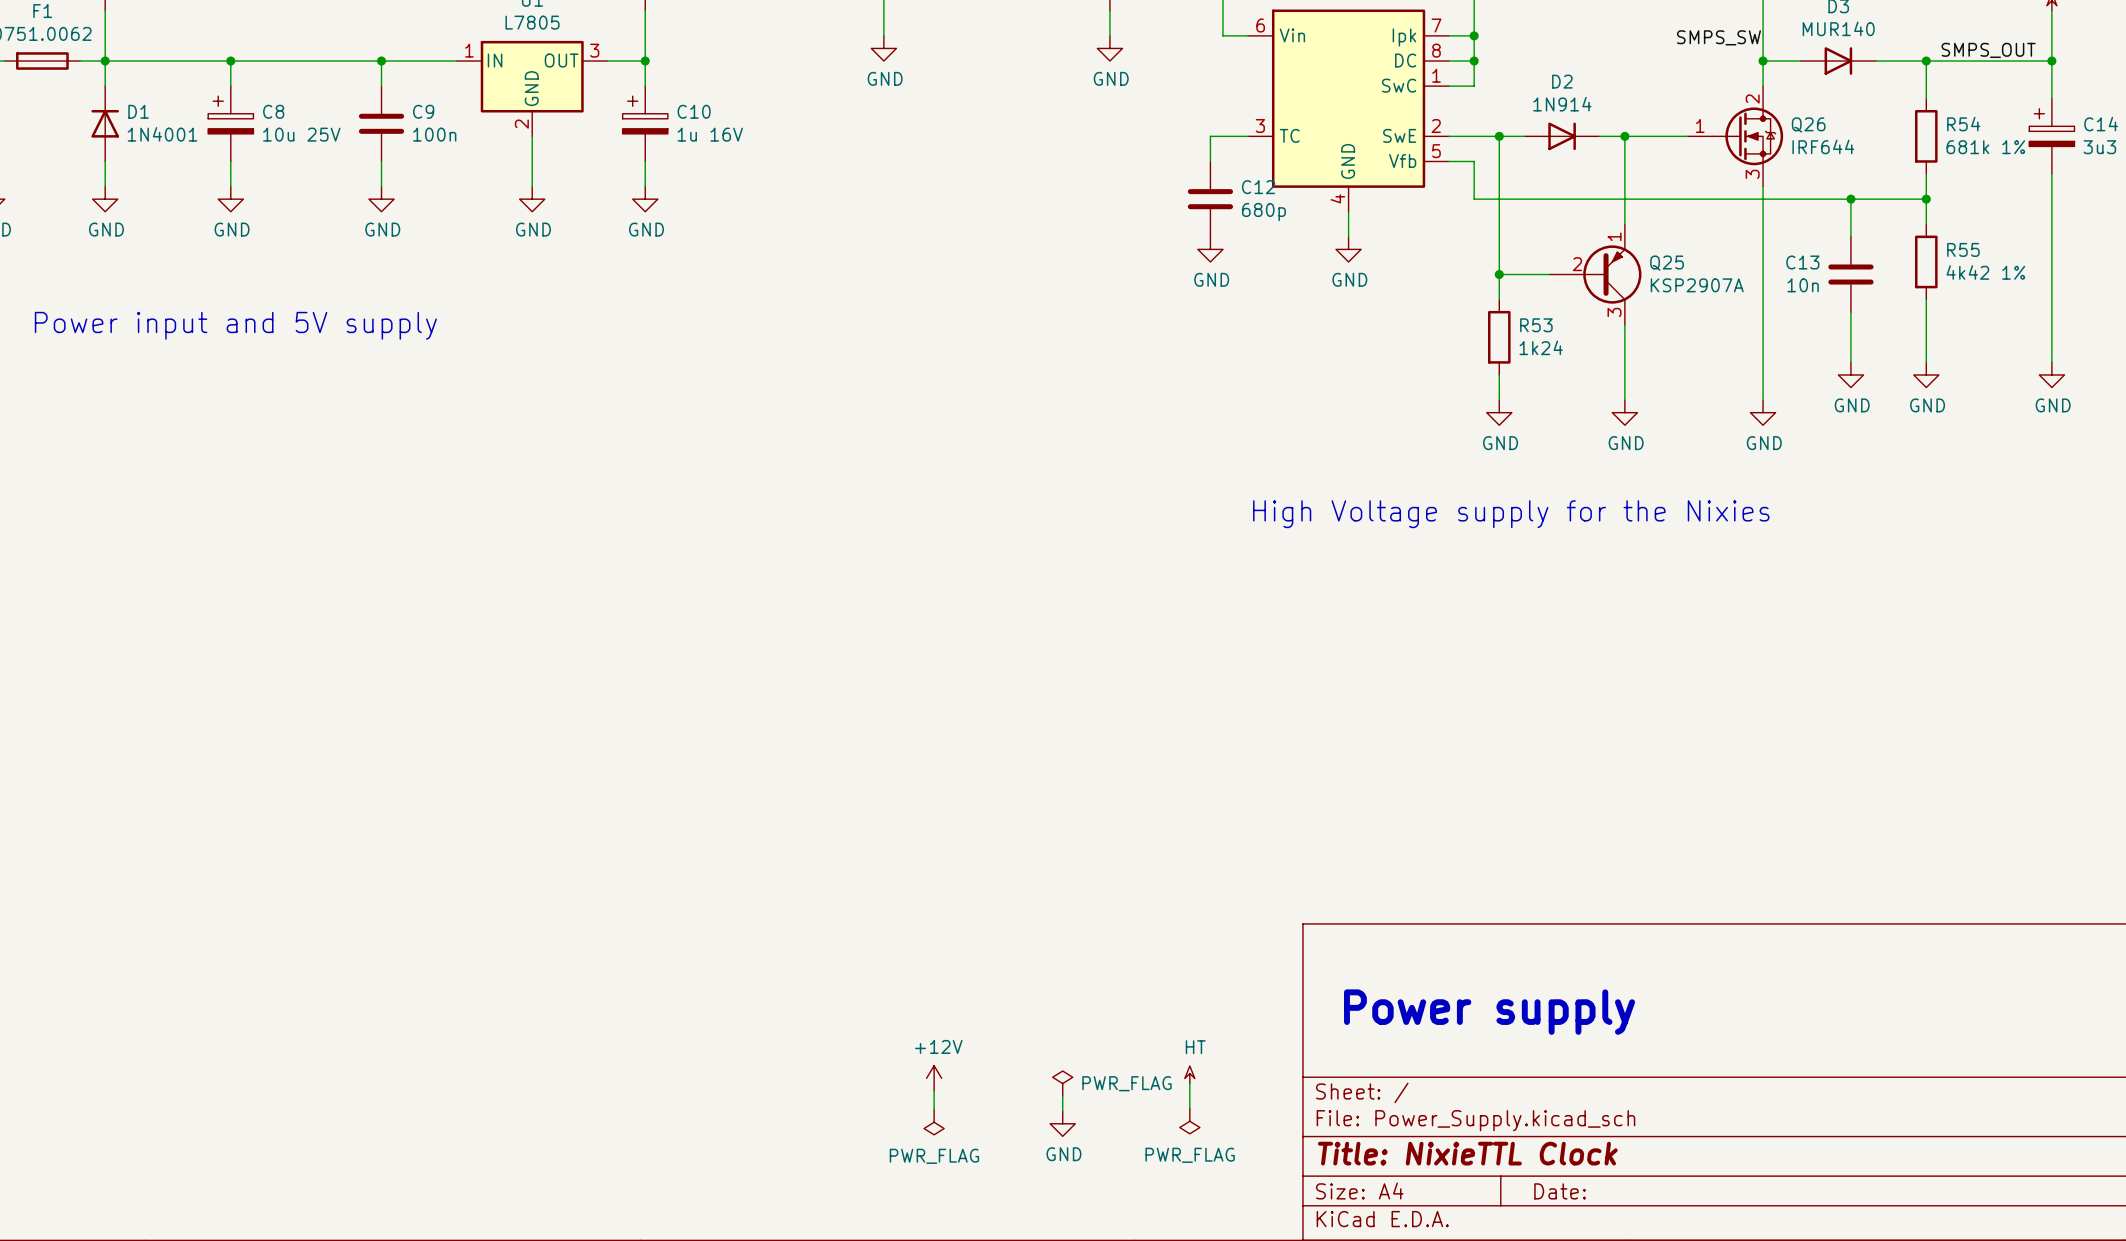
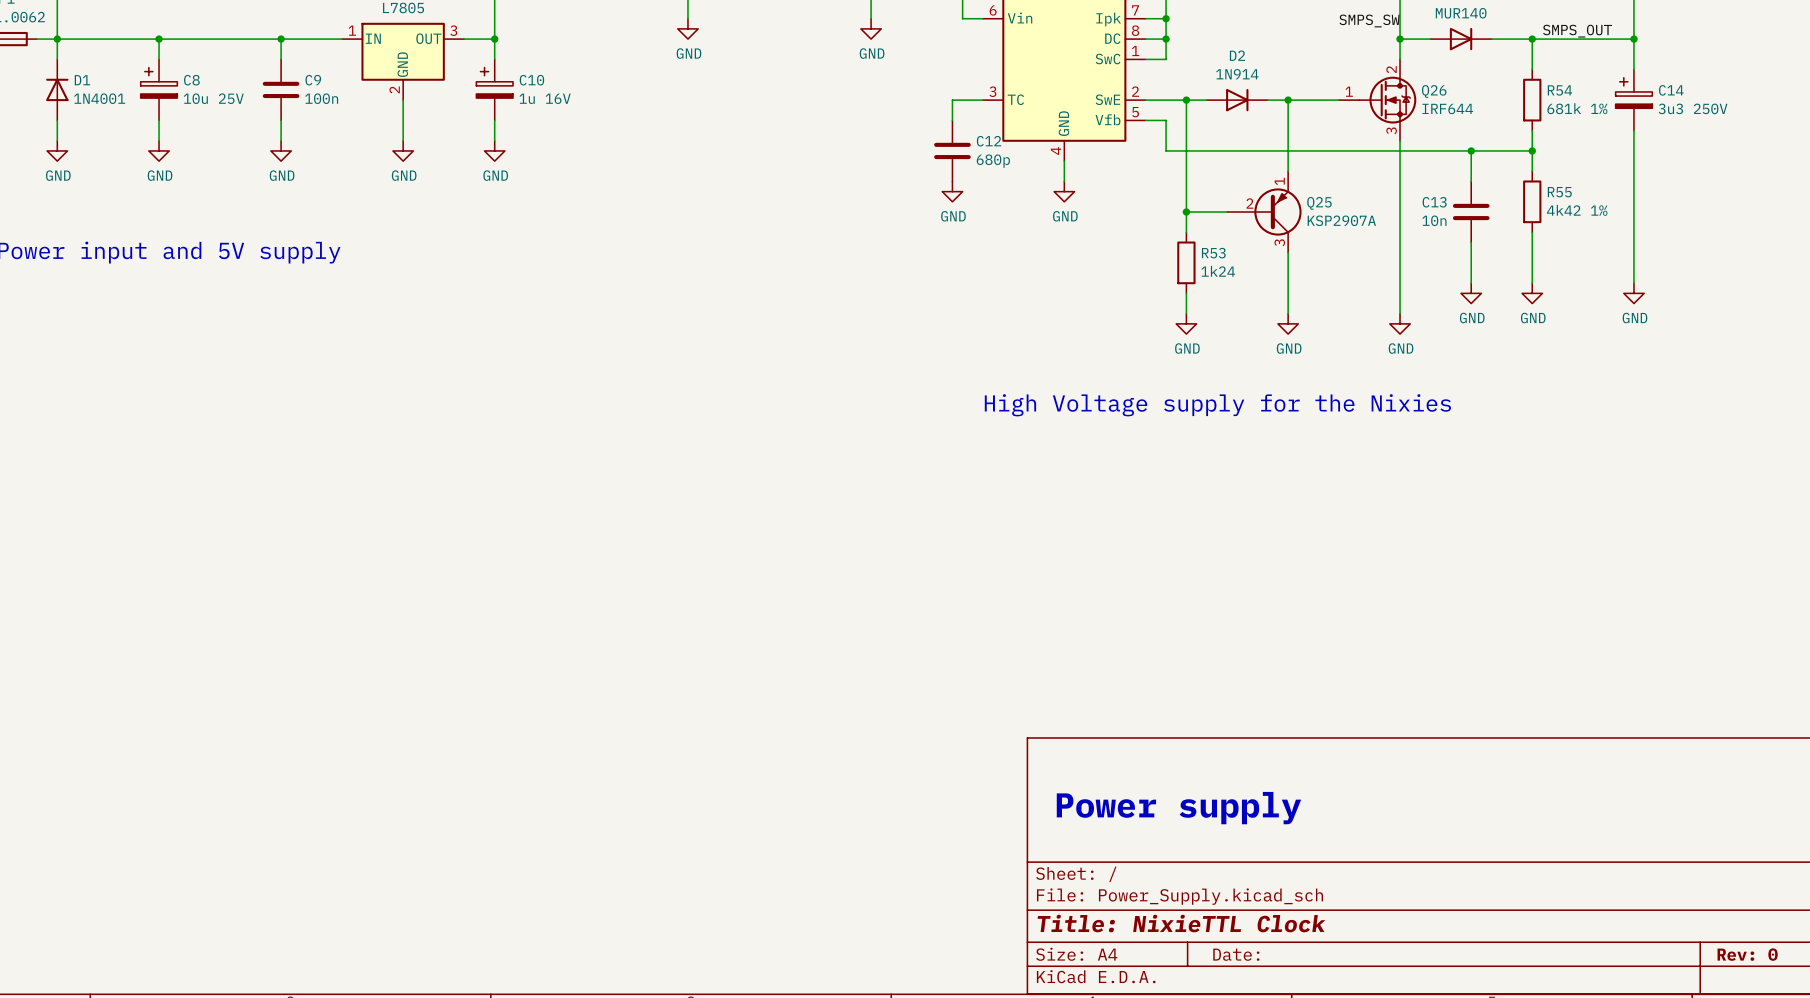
power symbol: HT (1189, 1074) -> none
power symbol: +12V (934, 1078) -> none
power symbol: PWR_FLAG (1062, 1083) -> none
wire: (1189, 1083) (1189, 1108) -> none
wire: (934, 1090) (934, 1109) -> none
wire: (1062, 1096) (1062, 1111) -> none
power symbol: PWR_FLAG (1189, 1121) -> none
power symbol: PWR_FLAG (934, 1122) -> none
power symbol: GND (1062, 1123) -> none

